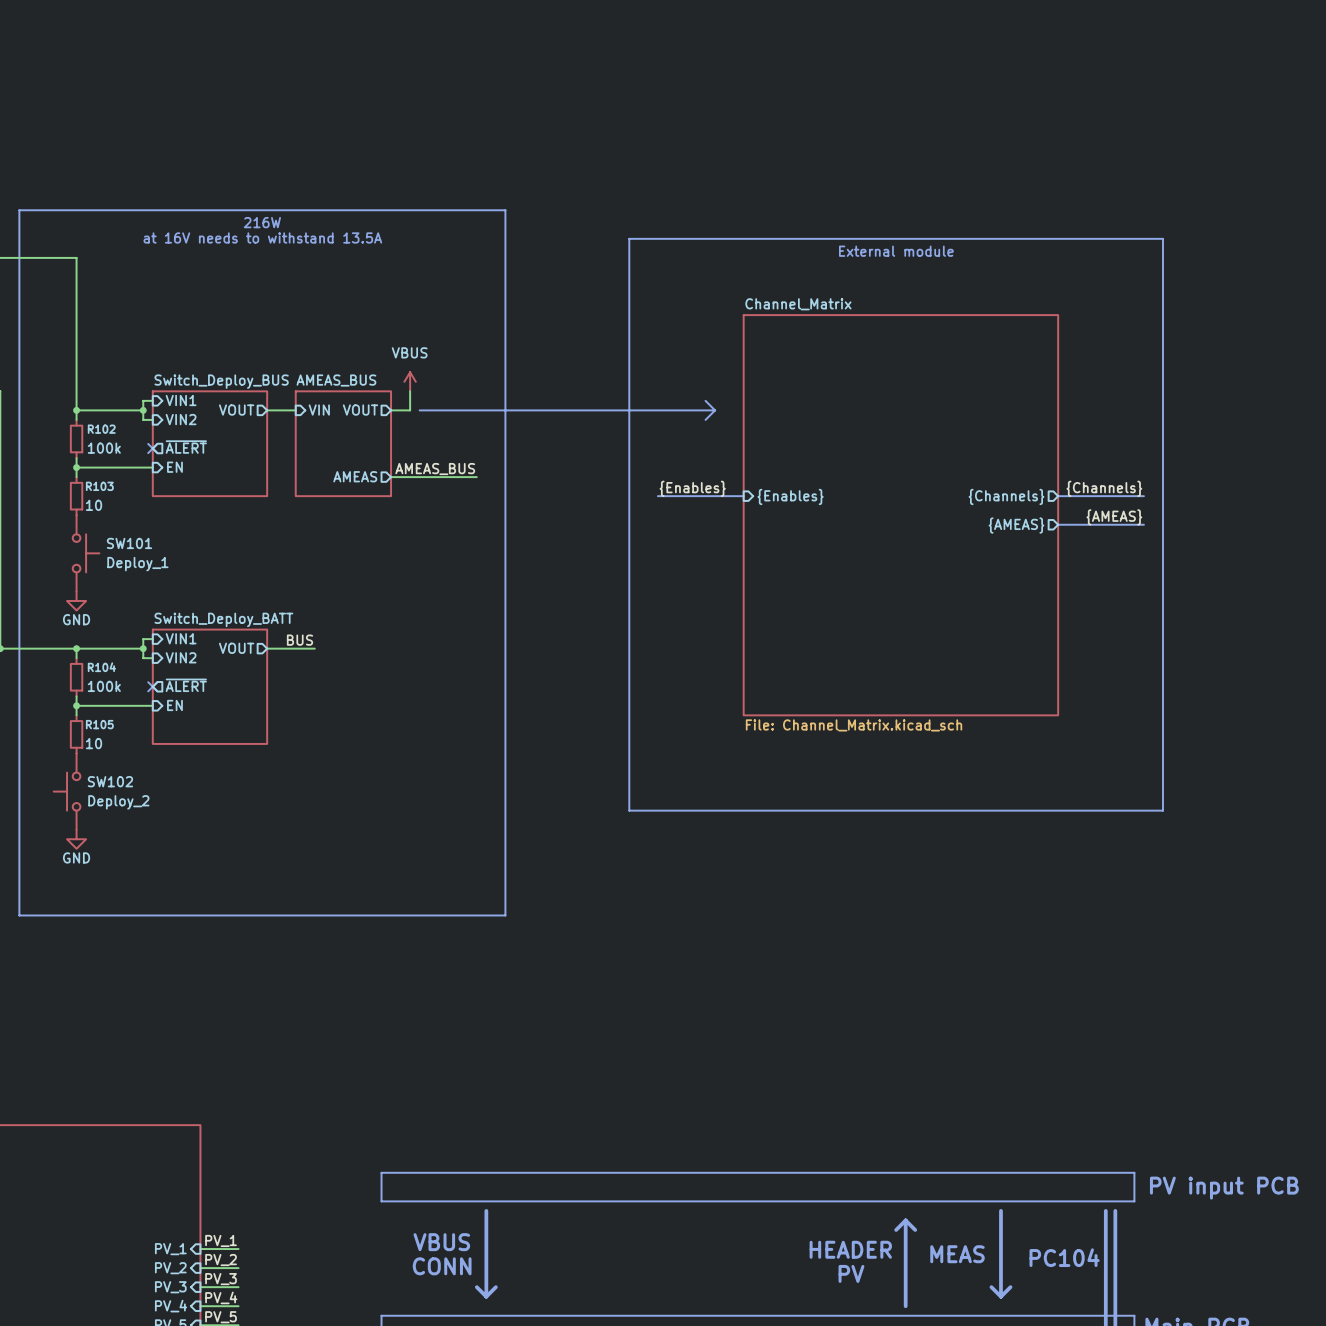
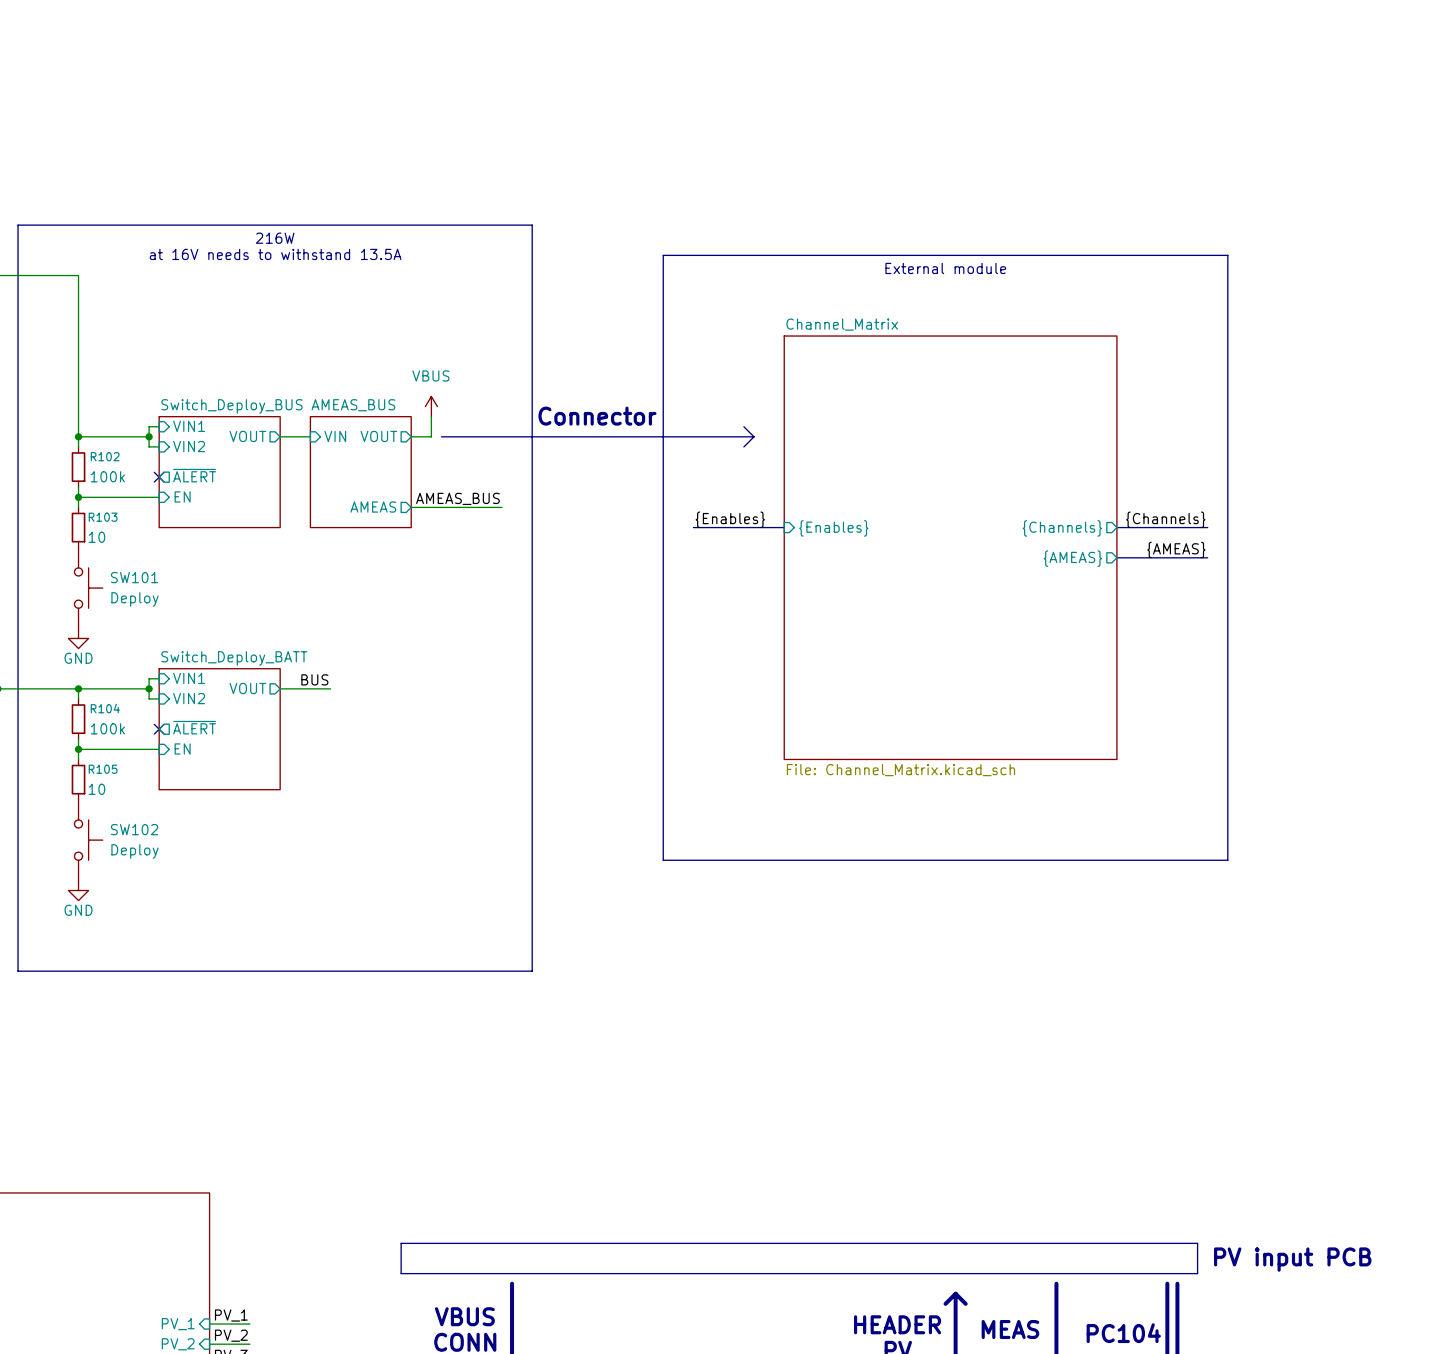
text: none -> Connector (597, 416)
SW101 value: Deploy_1 (137, 564) -> Deploy (135, 599)
SW102 rotation: 0° (67, 791) -> 180° (88, 840)
SW102 value: Deploy_2 (118, 802) -> Deploy (135, 851)

